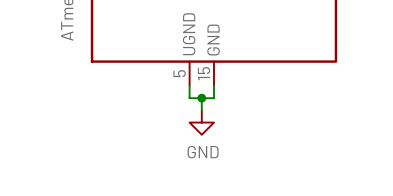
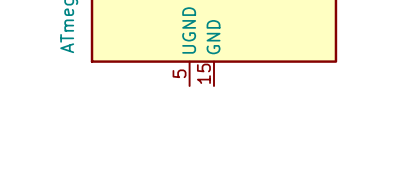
wire: (189, 85) (189, 98) (213, 98) (213, 85) -> none
wire: (201, 98) (201, 110) -> none
junction: (201, 98) -> none
power symbol: GND (201, 122) -> none

